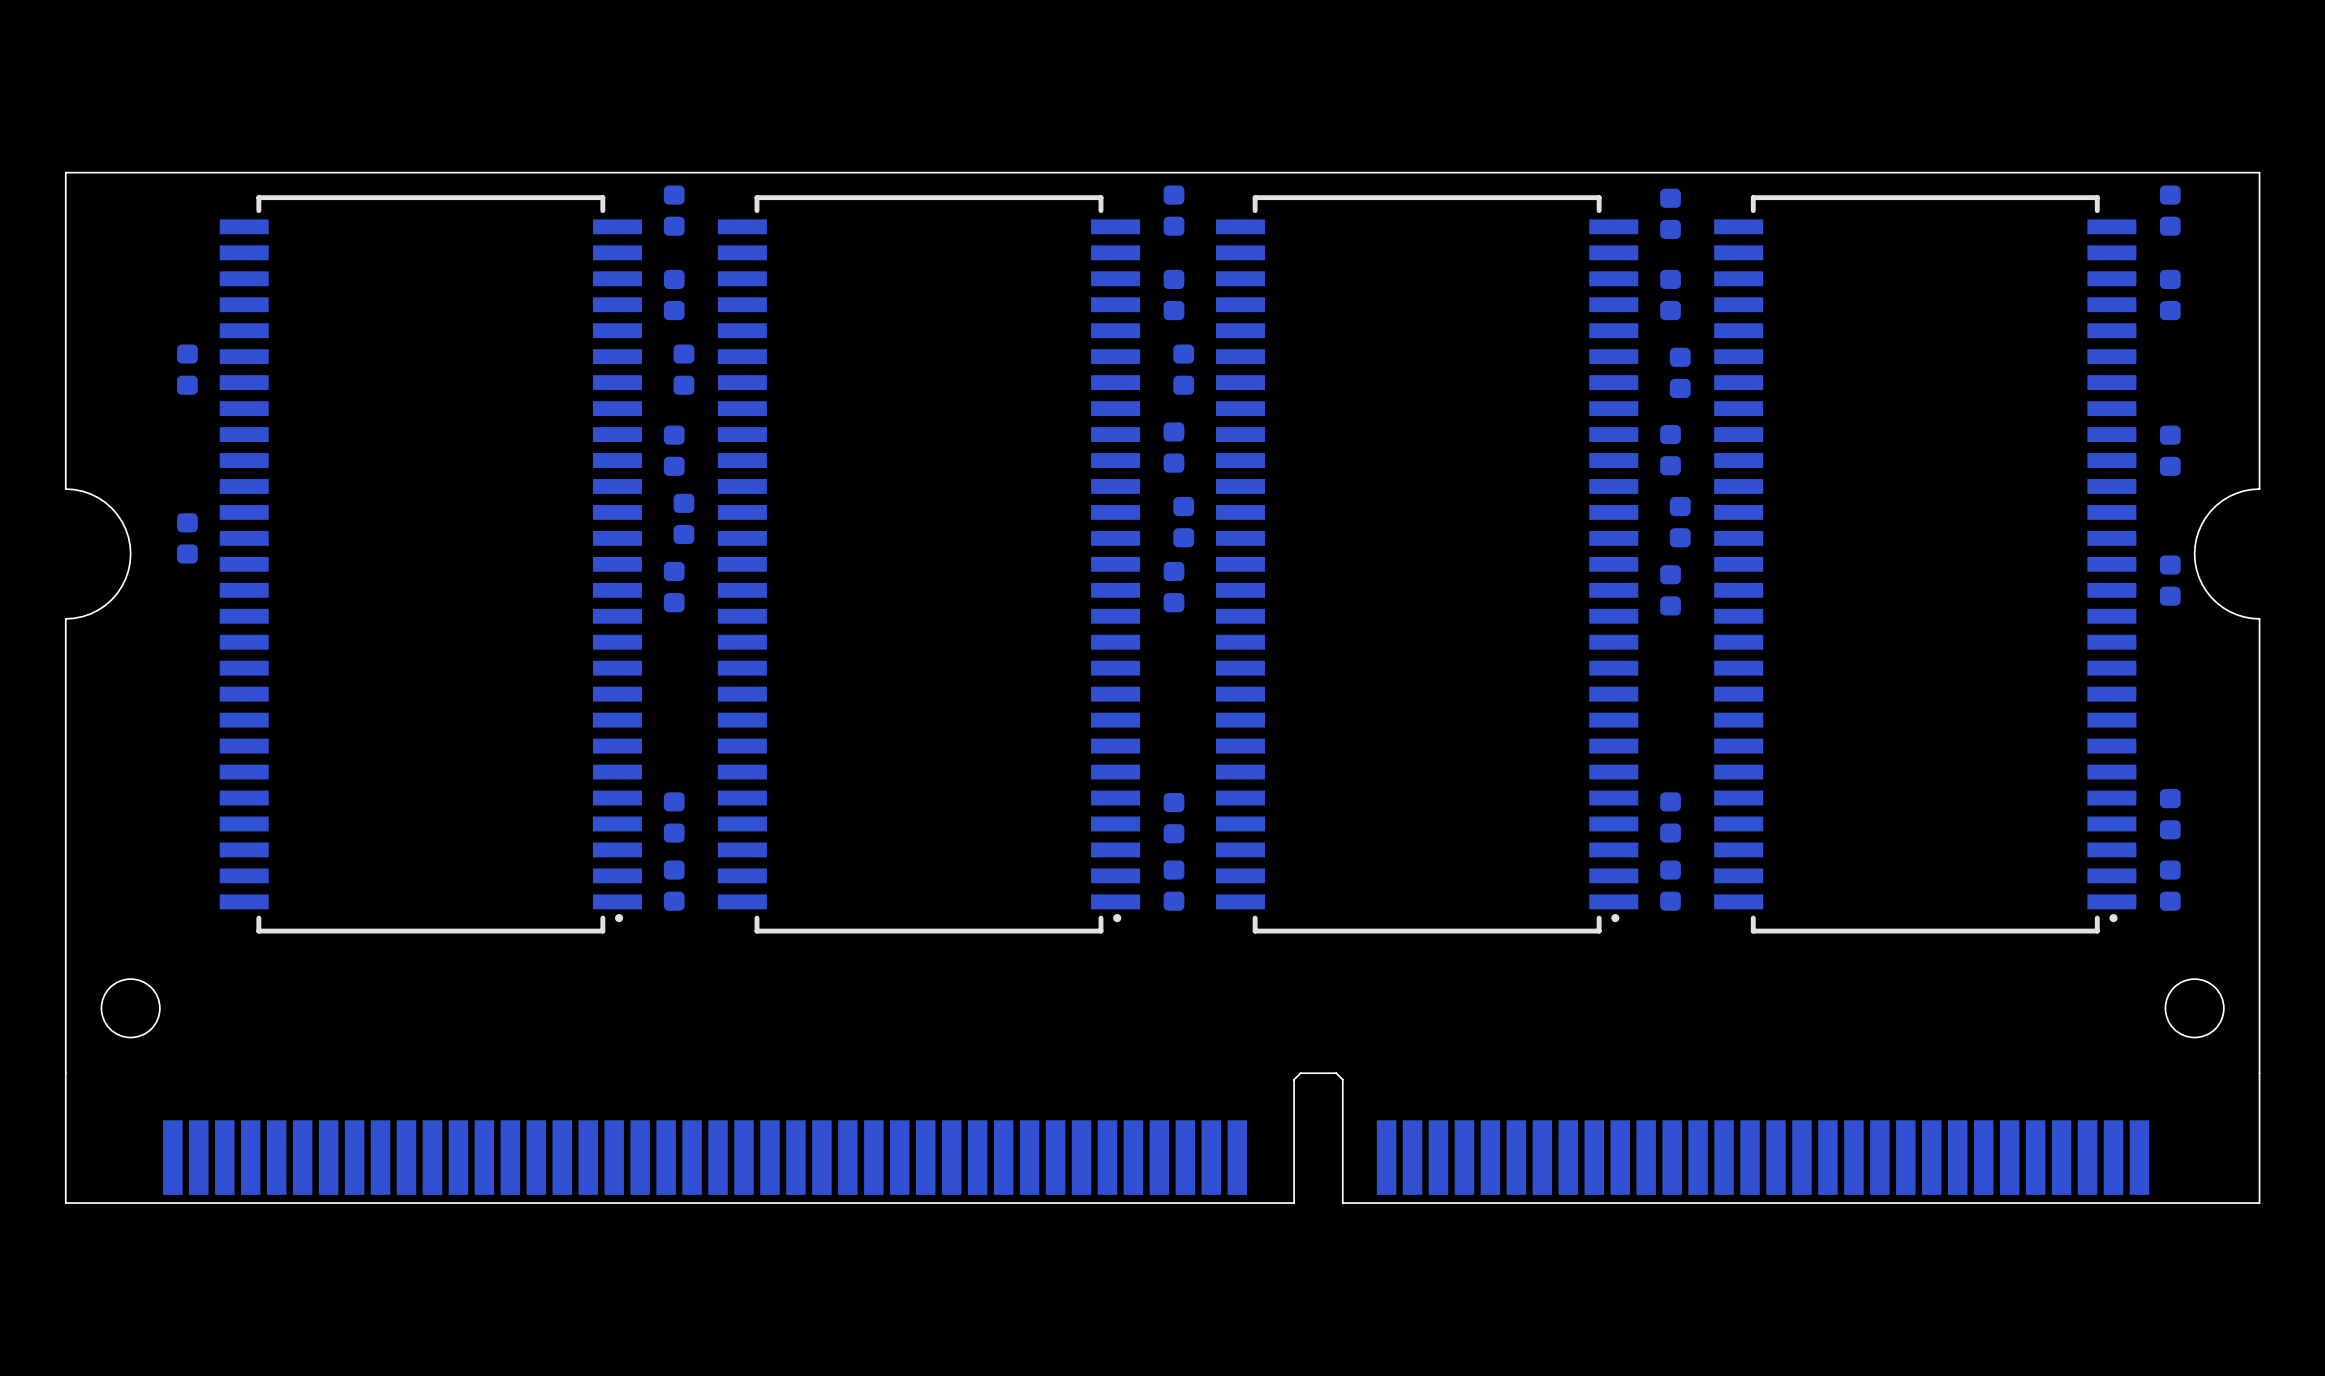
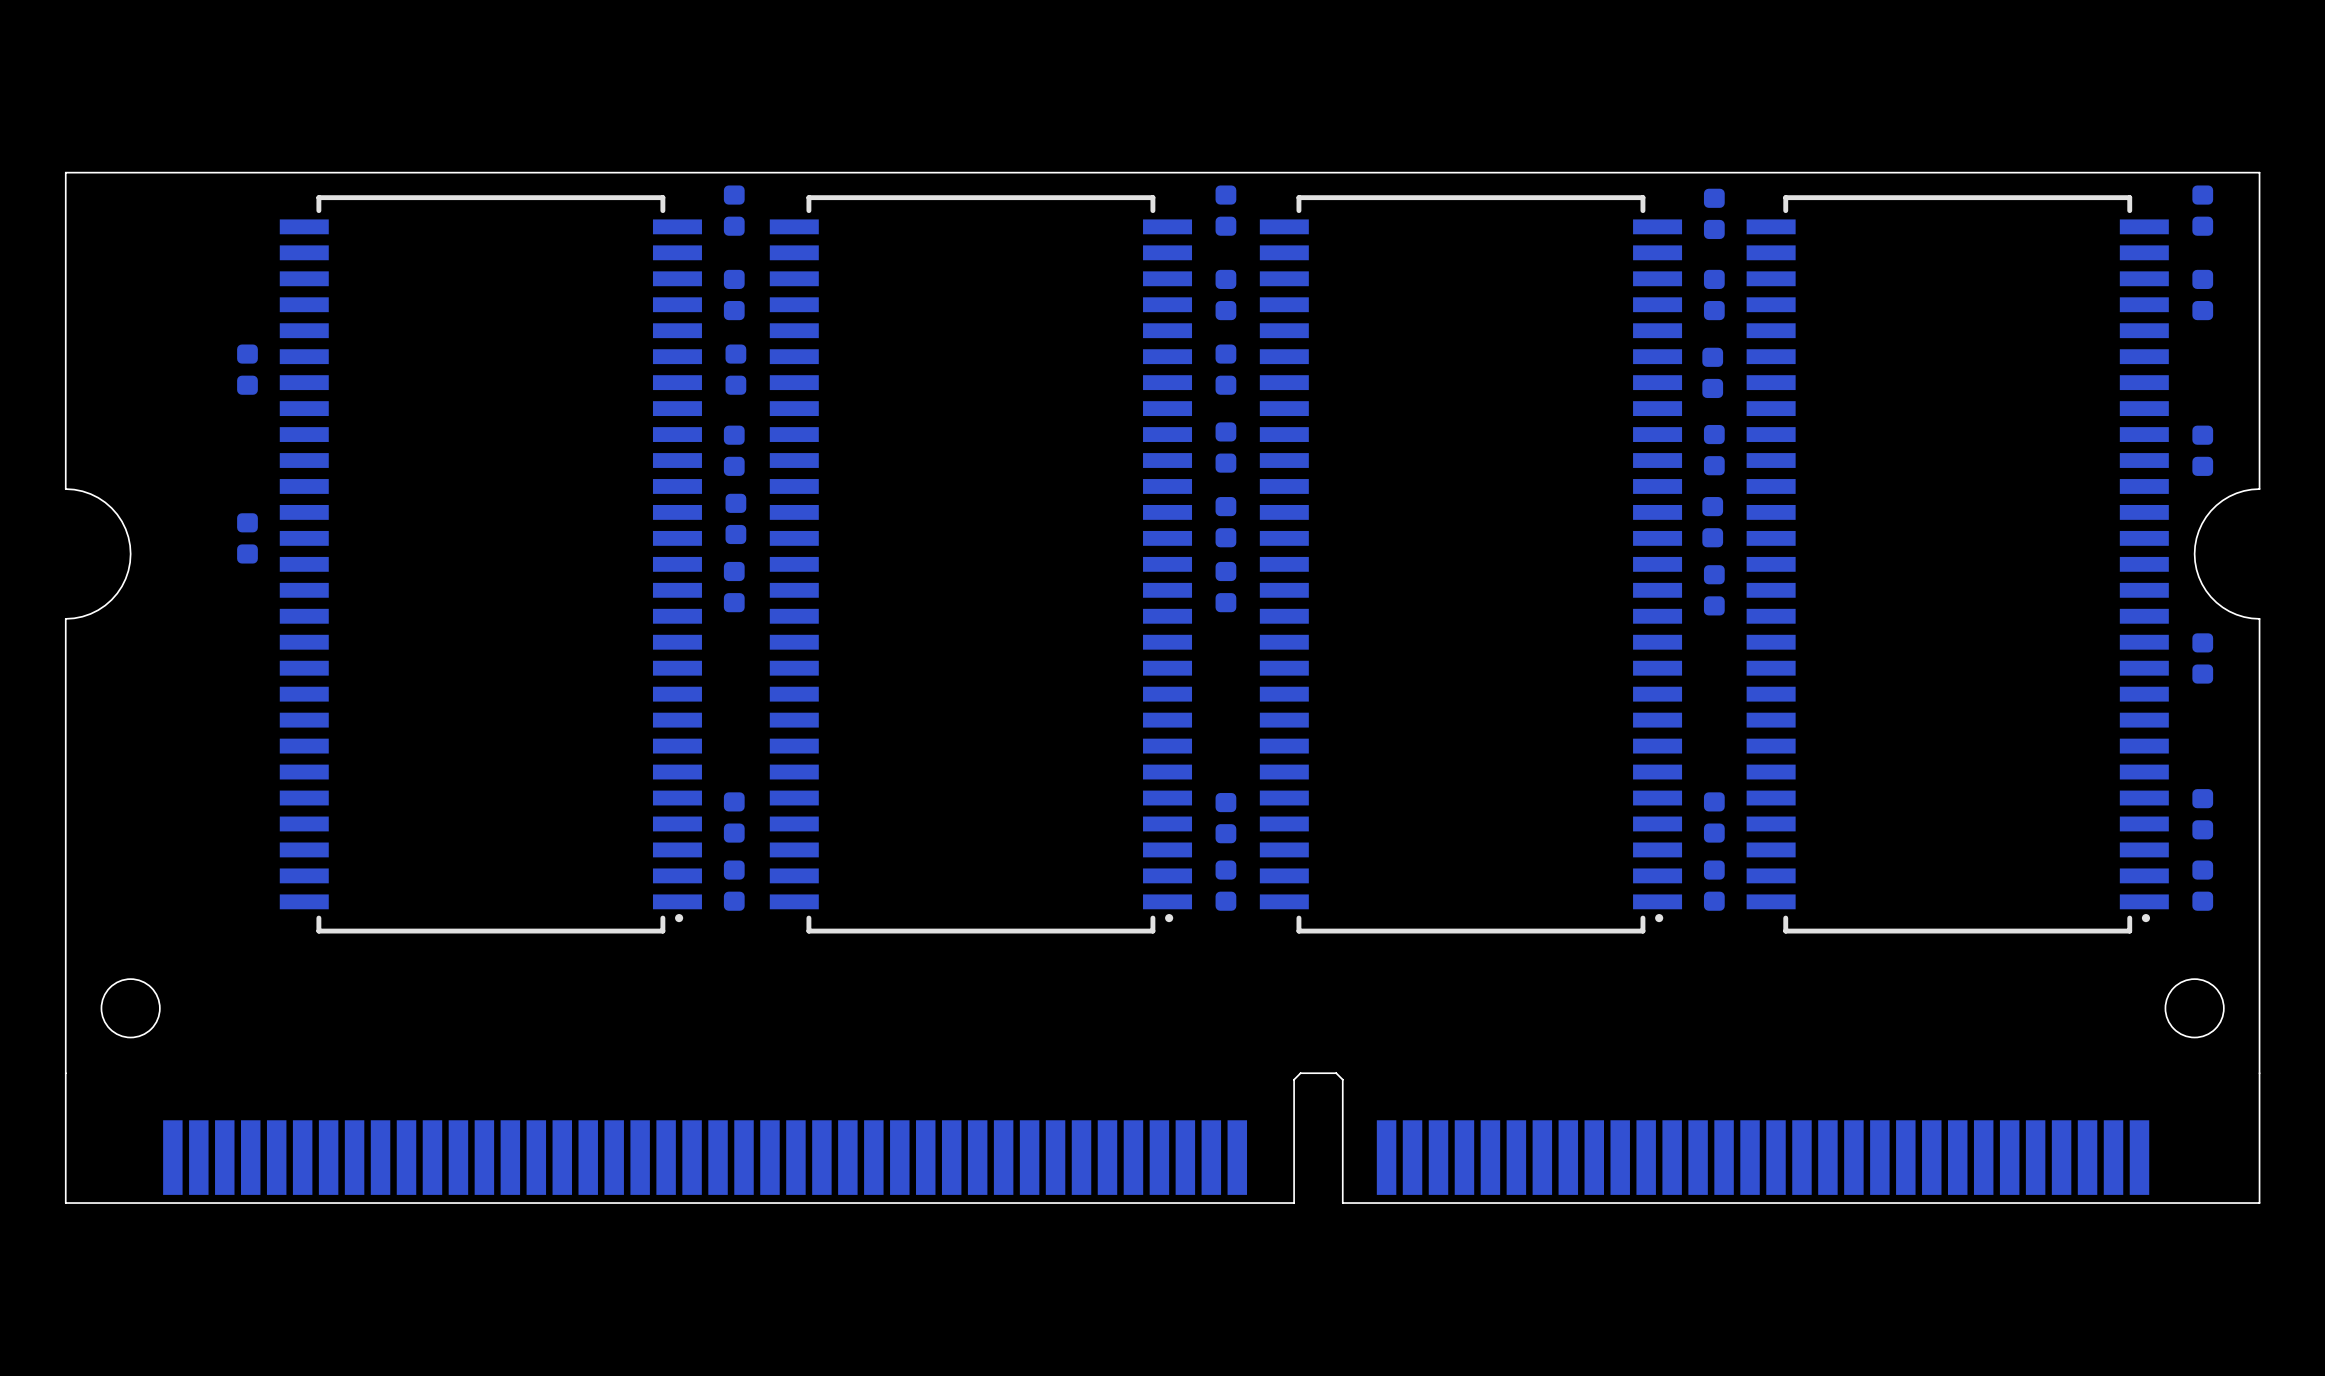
part: (674, 210) -> none
part: none -> (734, 210)
part: (1174, 210) -> none
part: none -> (1225, 210)
part position: (2170, 210) -> (2202, 210)
part position: (1670, 213) -> (1714, 213)
part: (674, 295) -> none
part: none -> (734, 295)
part: (1174, 295) -> none
part: none -> (1225, 295)
part position: (1670, 295) -> (1714, 295)
part position: (2170, 295) -> (2202, 295)
part position: (187, 369) -> (247, 369)
part: (683, 369) -> none
part: none -> (735, 369)
part position: (1183, 369) -> (1225, 369)
part position: (1680, 372) -> (1712, 372)
part: (1174, 447) -> none
part: none -> (1225, 447)
part: (674, 450) -> none
part: none -> (734, 450)
part position: (1670, 450) -> (1714, 450)
part position: (2170, 450) -> (2202, 450)
part: (683, 518) -> none
part: none -> (735, 518)
part: (1183, 522) -> none
part: none -> (1225, 522)
part position: (1680, 522) -> (1712, 522)
part position: (187, 538) -> (247, 538)
part position: (430, 564) -> (490, 564)
part position: (928, 564) -> (980, 564)
part position: (1427, 564) -> (1470, 564)
part position: (1925, 564) -> (1957, 564)
part position: (2170, 580) -> (2202, 658)
part: (674, 587) -> none
part: none -> (734, 587)
part: (1174, 587) -> none
part: none -> (1225, 587)
part position: (1670, 590) -> (1714, 590)
part position: (2170, 814) -> (2202, 814)
part: (674, 817) -> none
part: none -> (734, 817)
part: (1670, 817) -> none
part: none -> (1714, 817)
part: (1174, 818) -> none
part: none -> (1225, 818)
part: (674, 885) -> none
part: none -> (734, 885)
part: (1174, 885) -> none
part: none -> (1225, 885)
part: (1670, 885) -> none
part: none -> (1714, 885)
part position: (2170, 885) -> (2202, 885)

